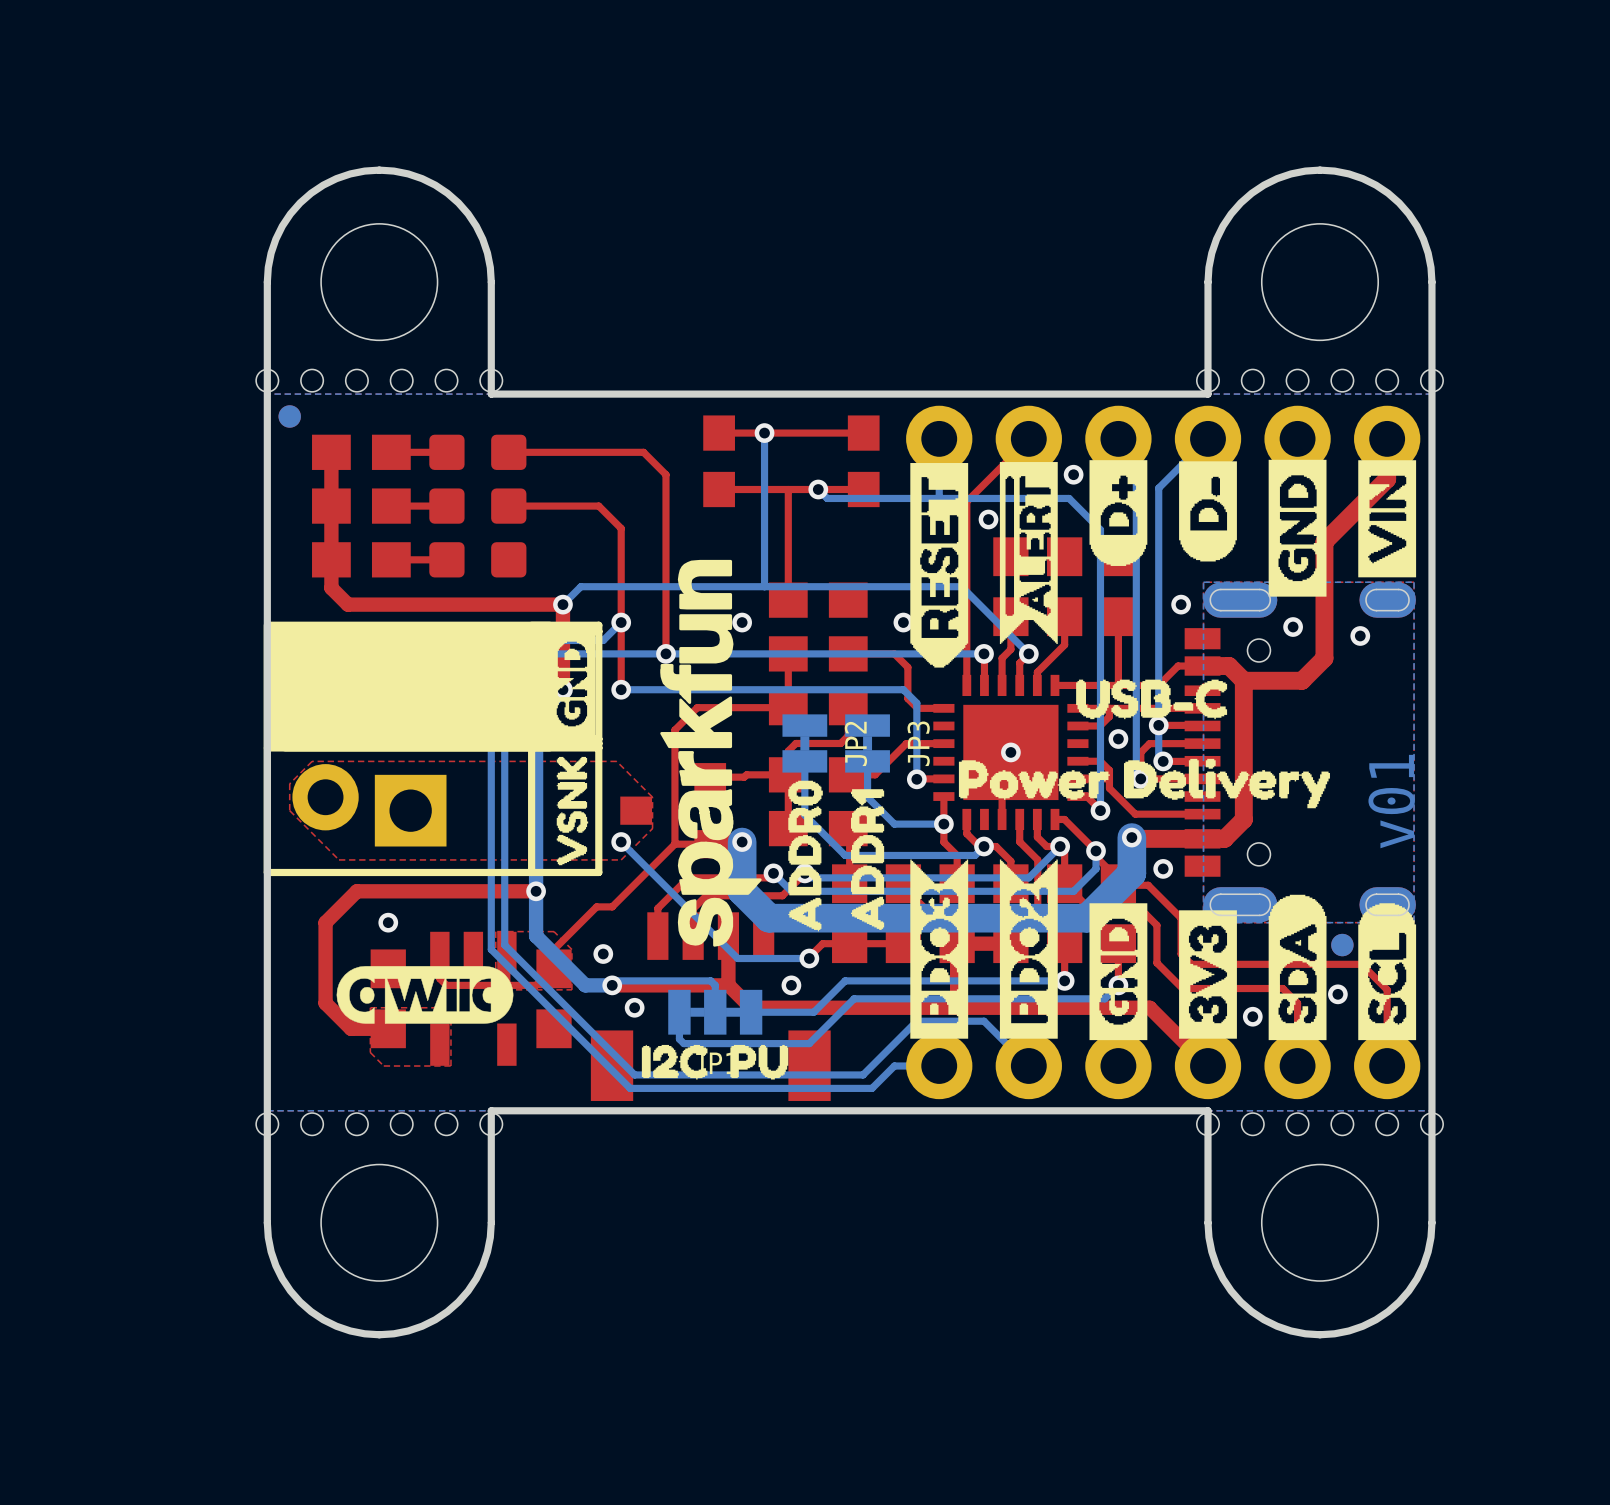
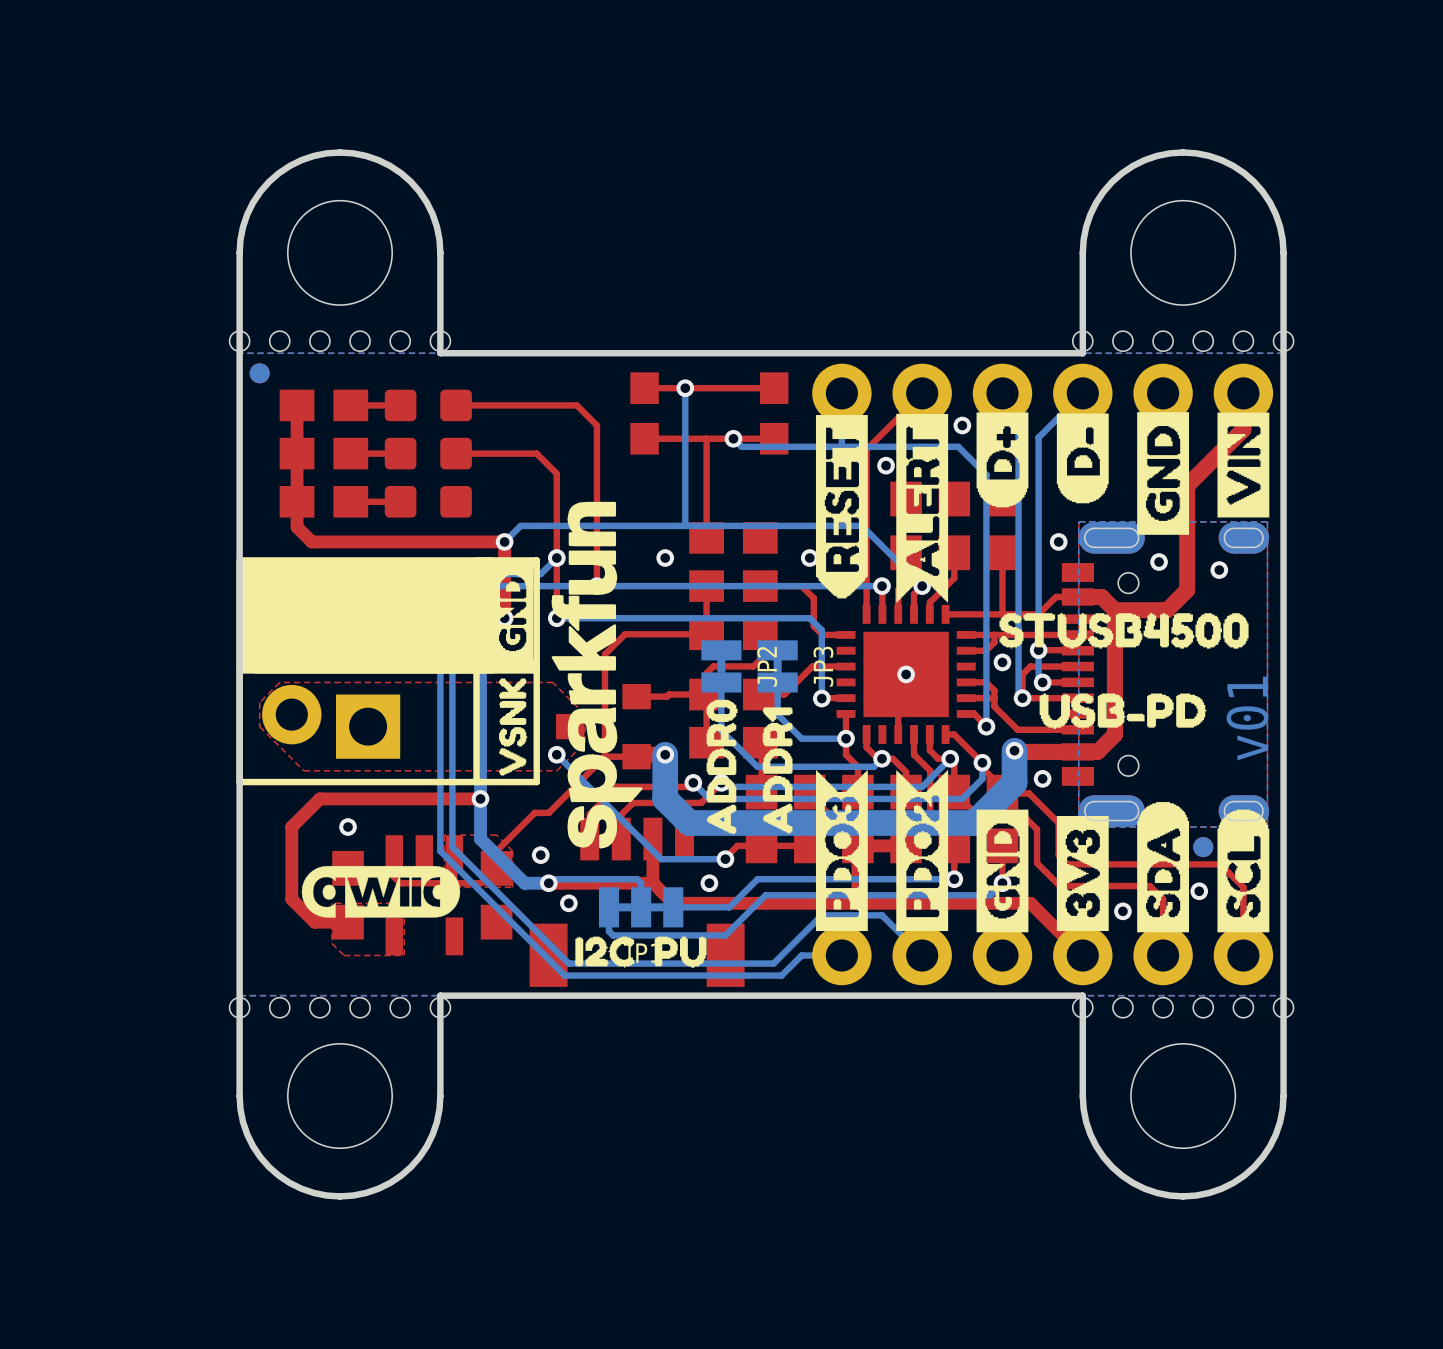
drawing shape: [999, 462, 1058, 645] -> [896, 413, 949, 603]
drawing: [958, 679, 1330, 809] -> none
drawing: none -> [999, 613, 1249, 649]
drawing position: (710, 753) -> (597, 675)
drawing: none -> [1039, 693, 1207, 729]

